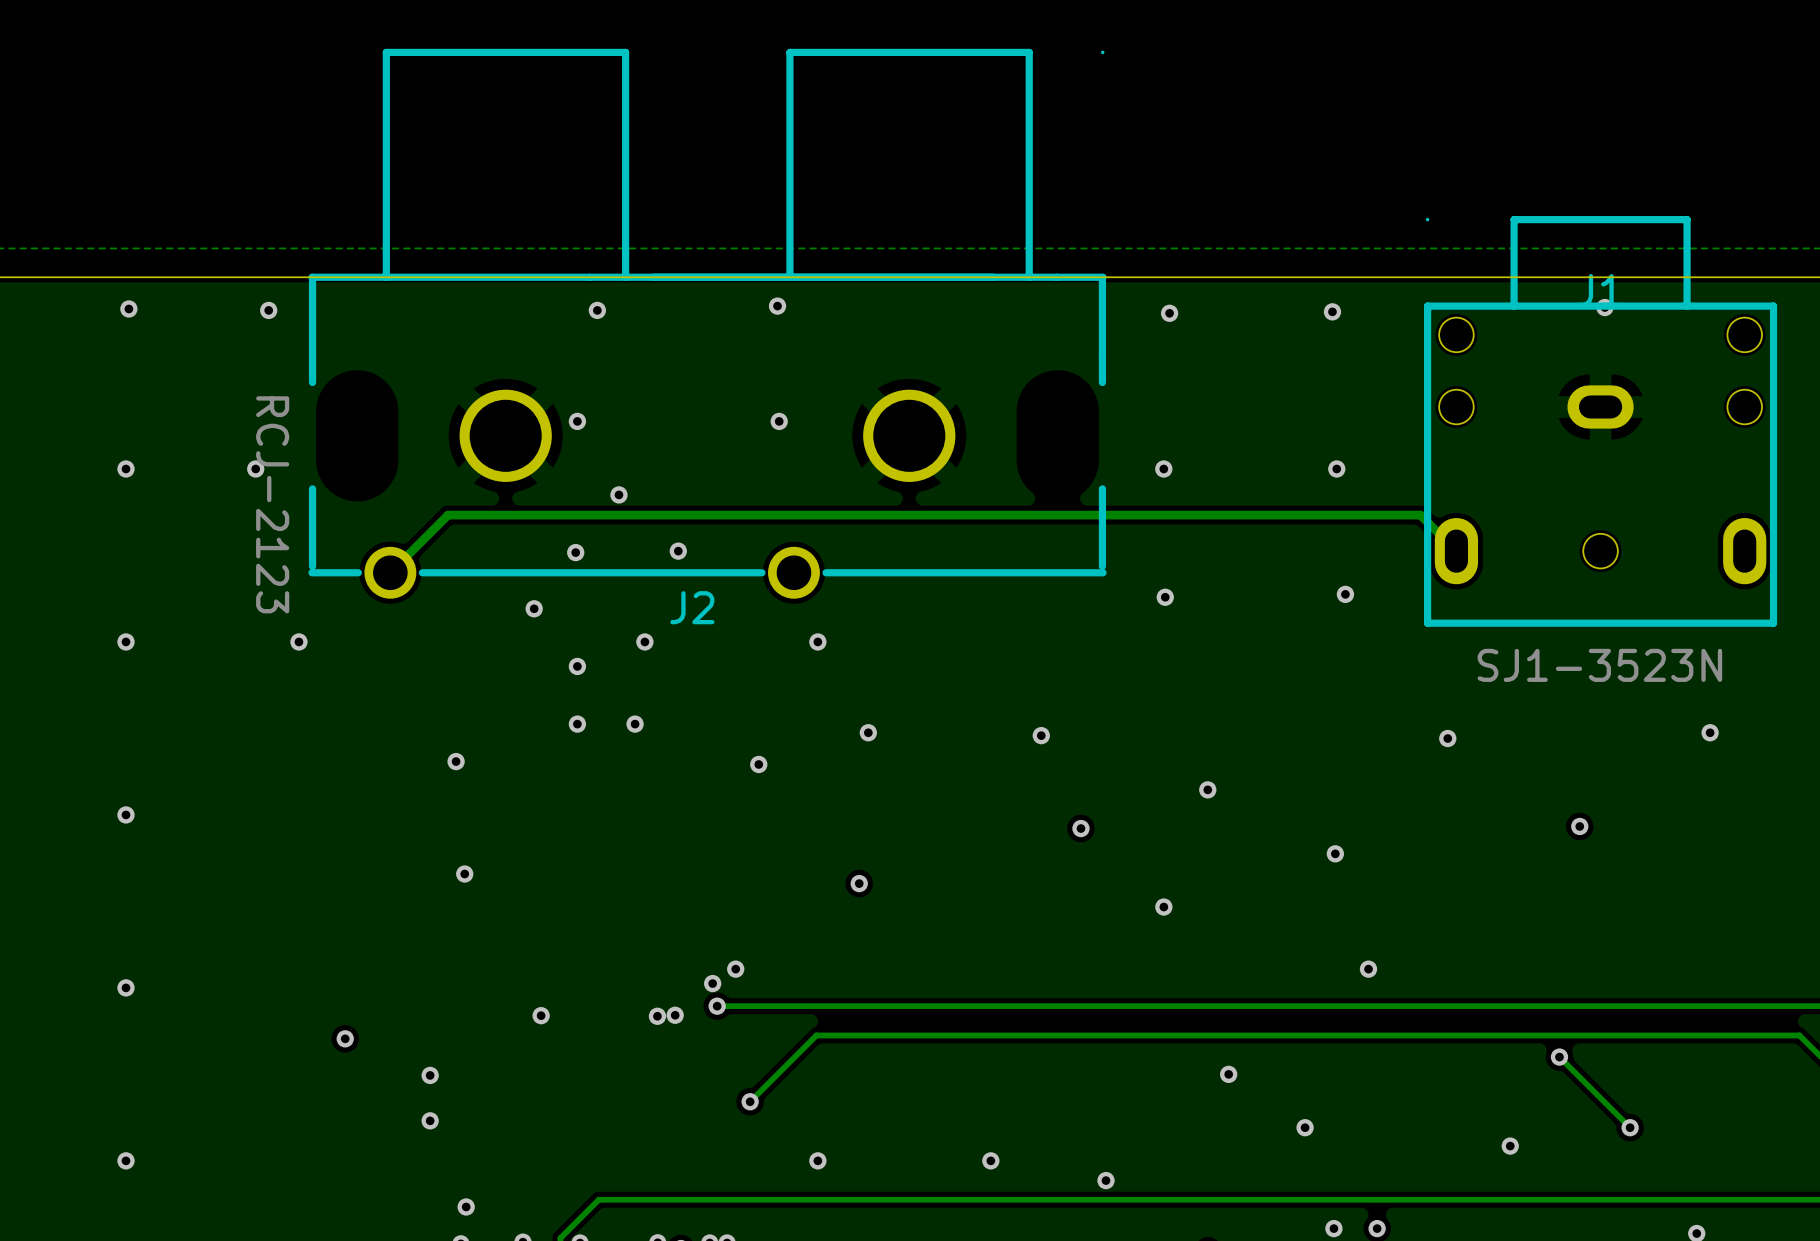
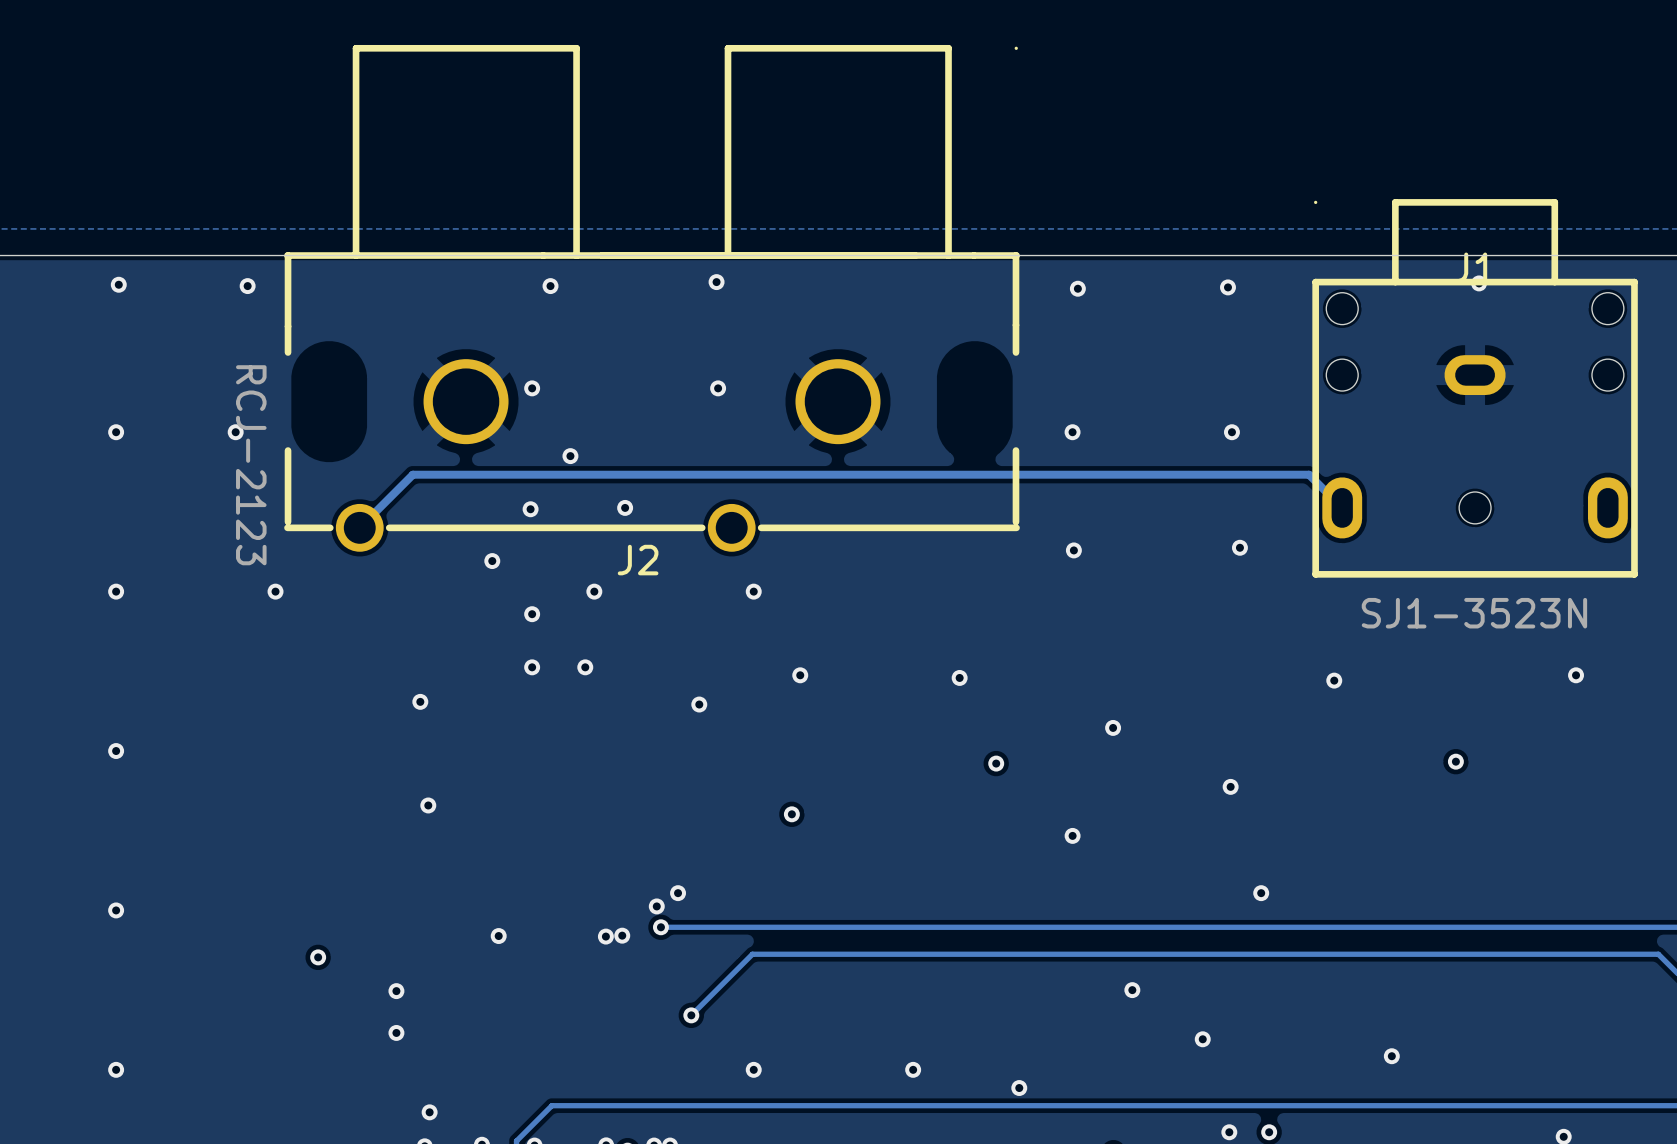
track: (1559, 1057) (1630, 1127) -> none
via: (1559, 1057) -> none
via: (1630, 1127) -> none

